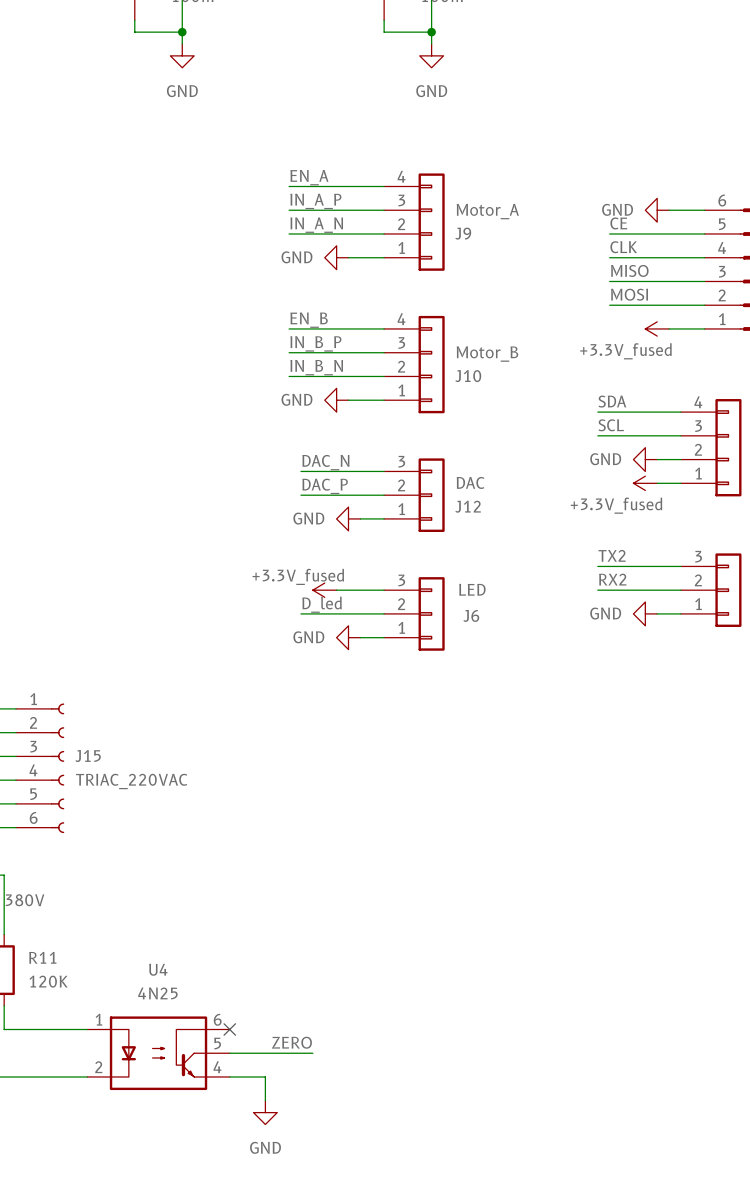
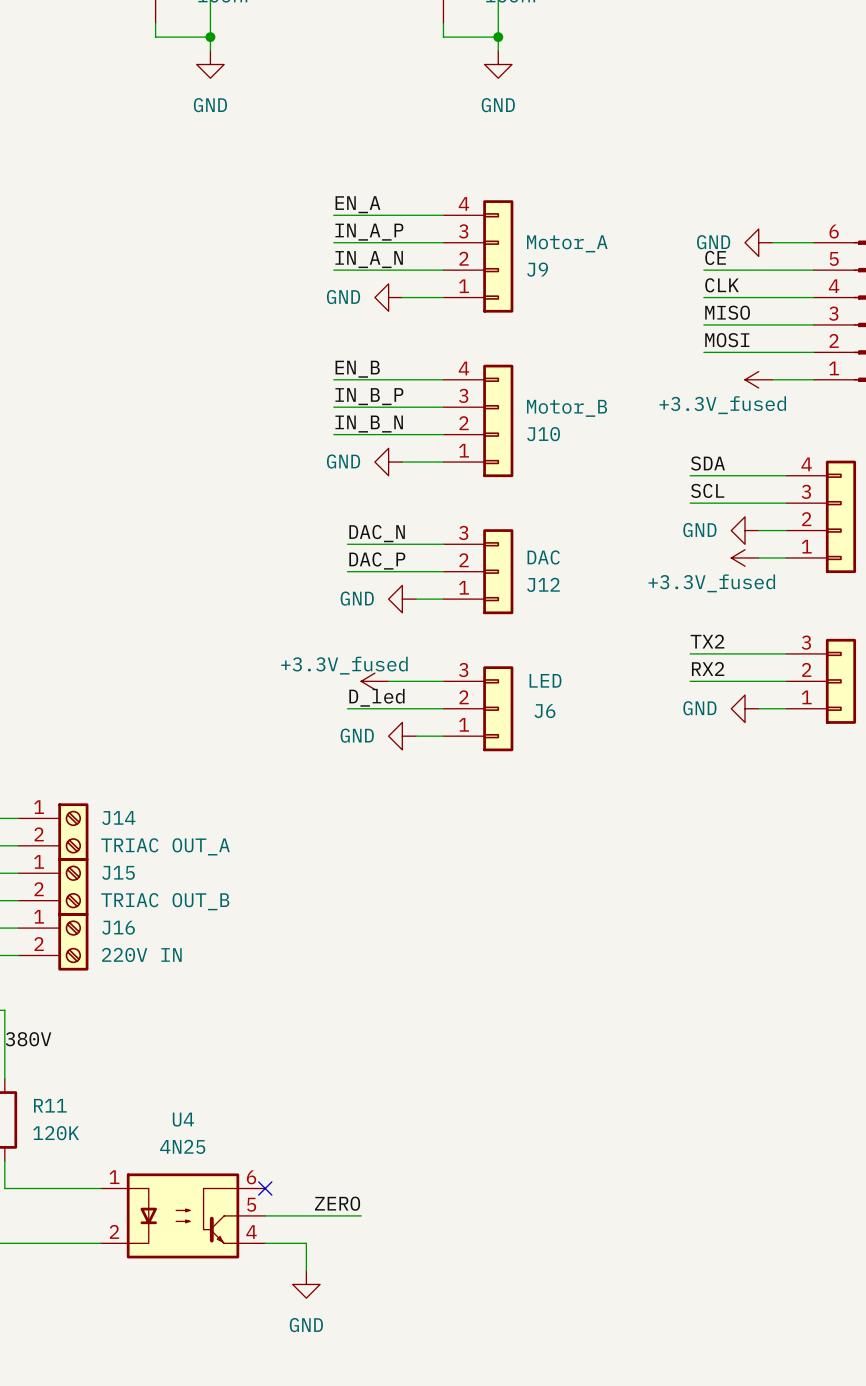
J15 symbol: [16, 703, 65, 834] -> [18, 858, 89, 916]
J14: none -> TRIAC OUT_A (53, 832)
J15 value: TRIAC_220VAC (131, 781) -> TRIAC OUT_B (165, 901)
J16: none -> 220V IN (53, 941)

